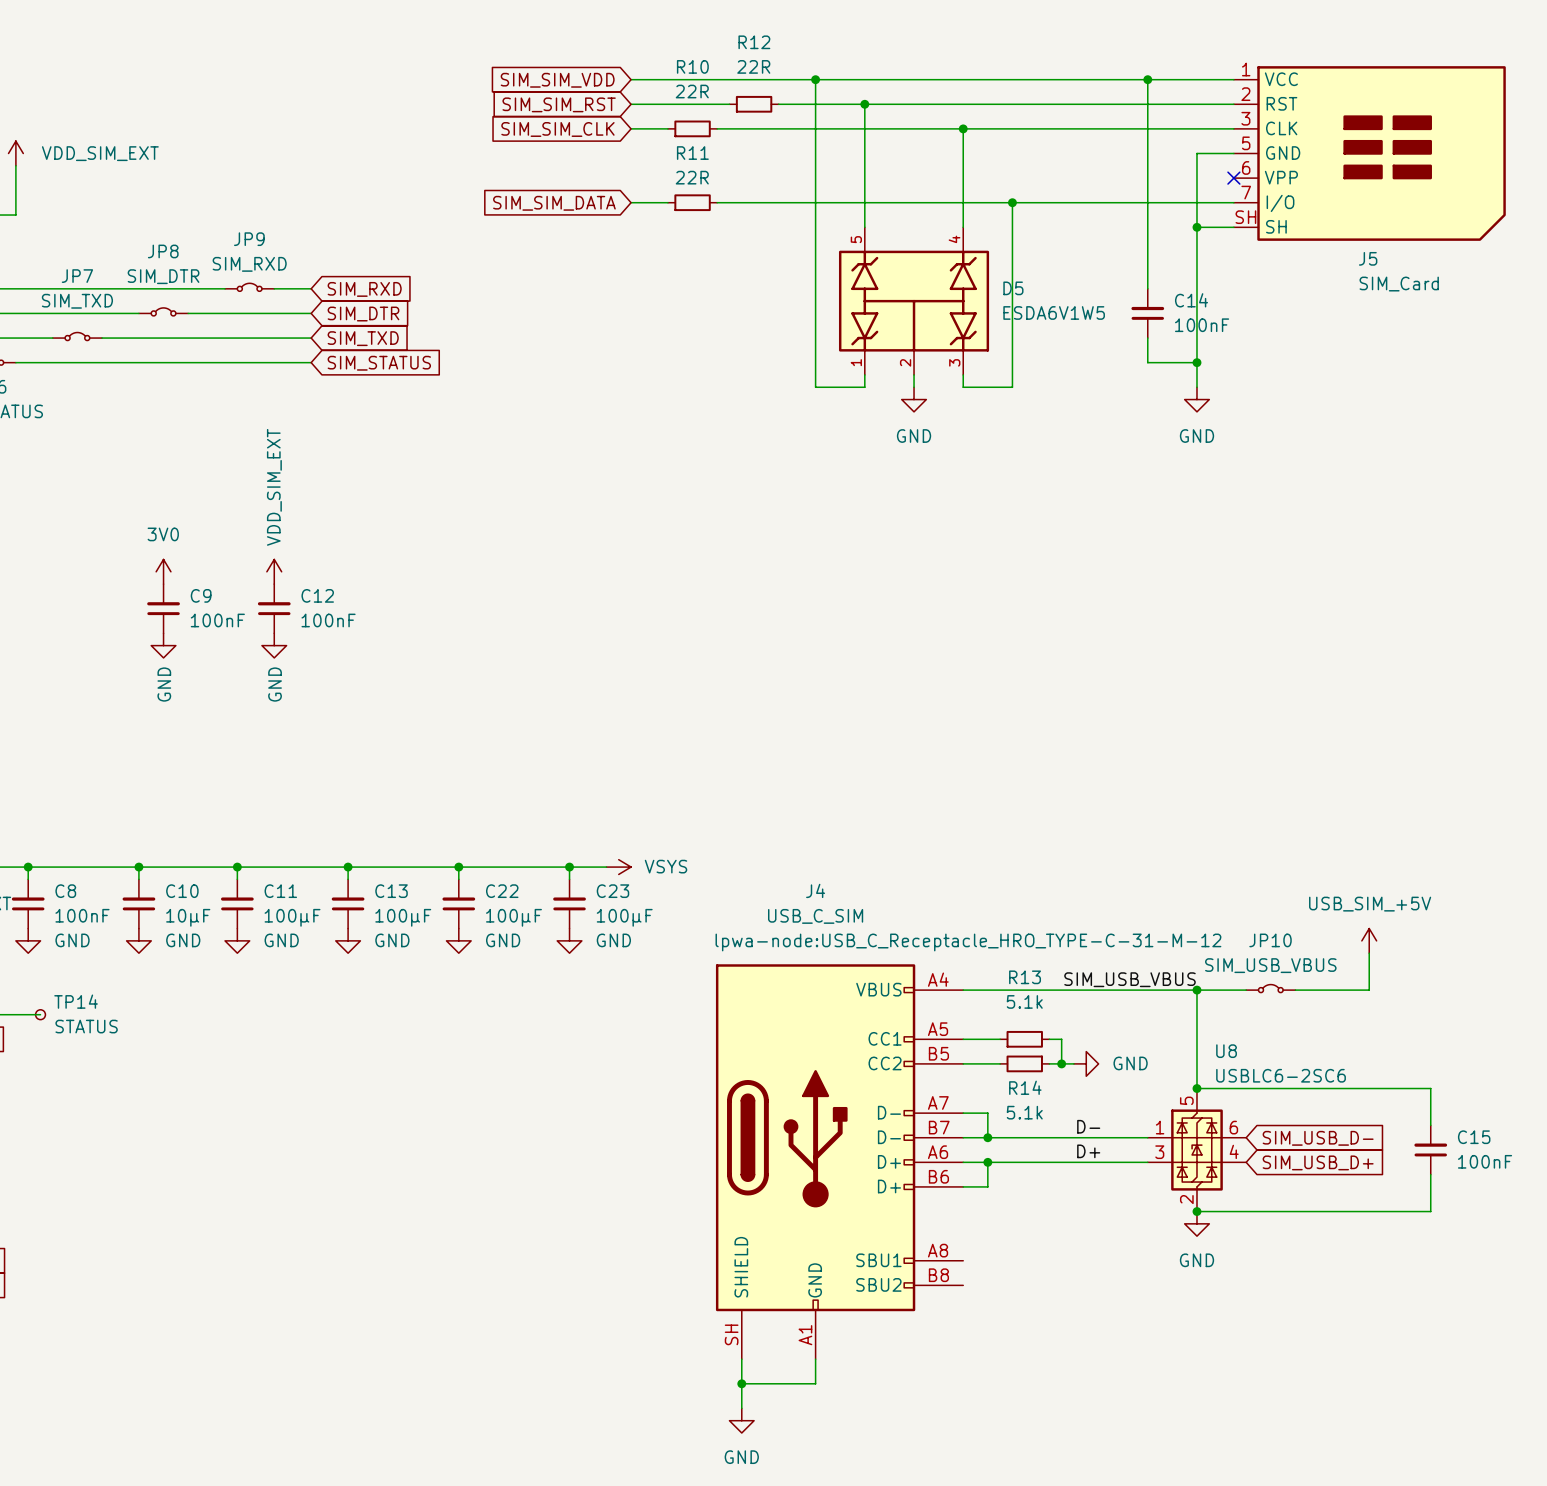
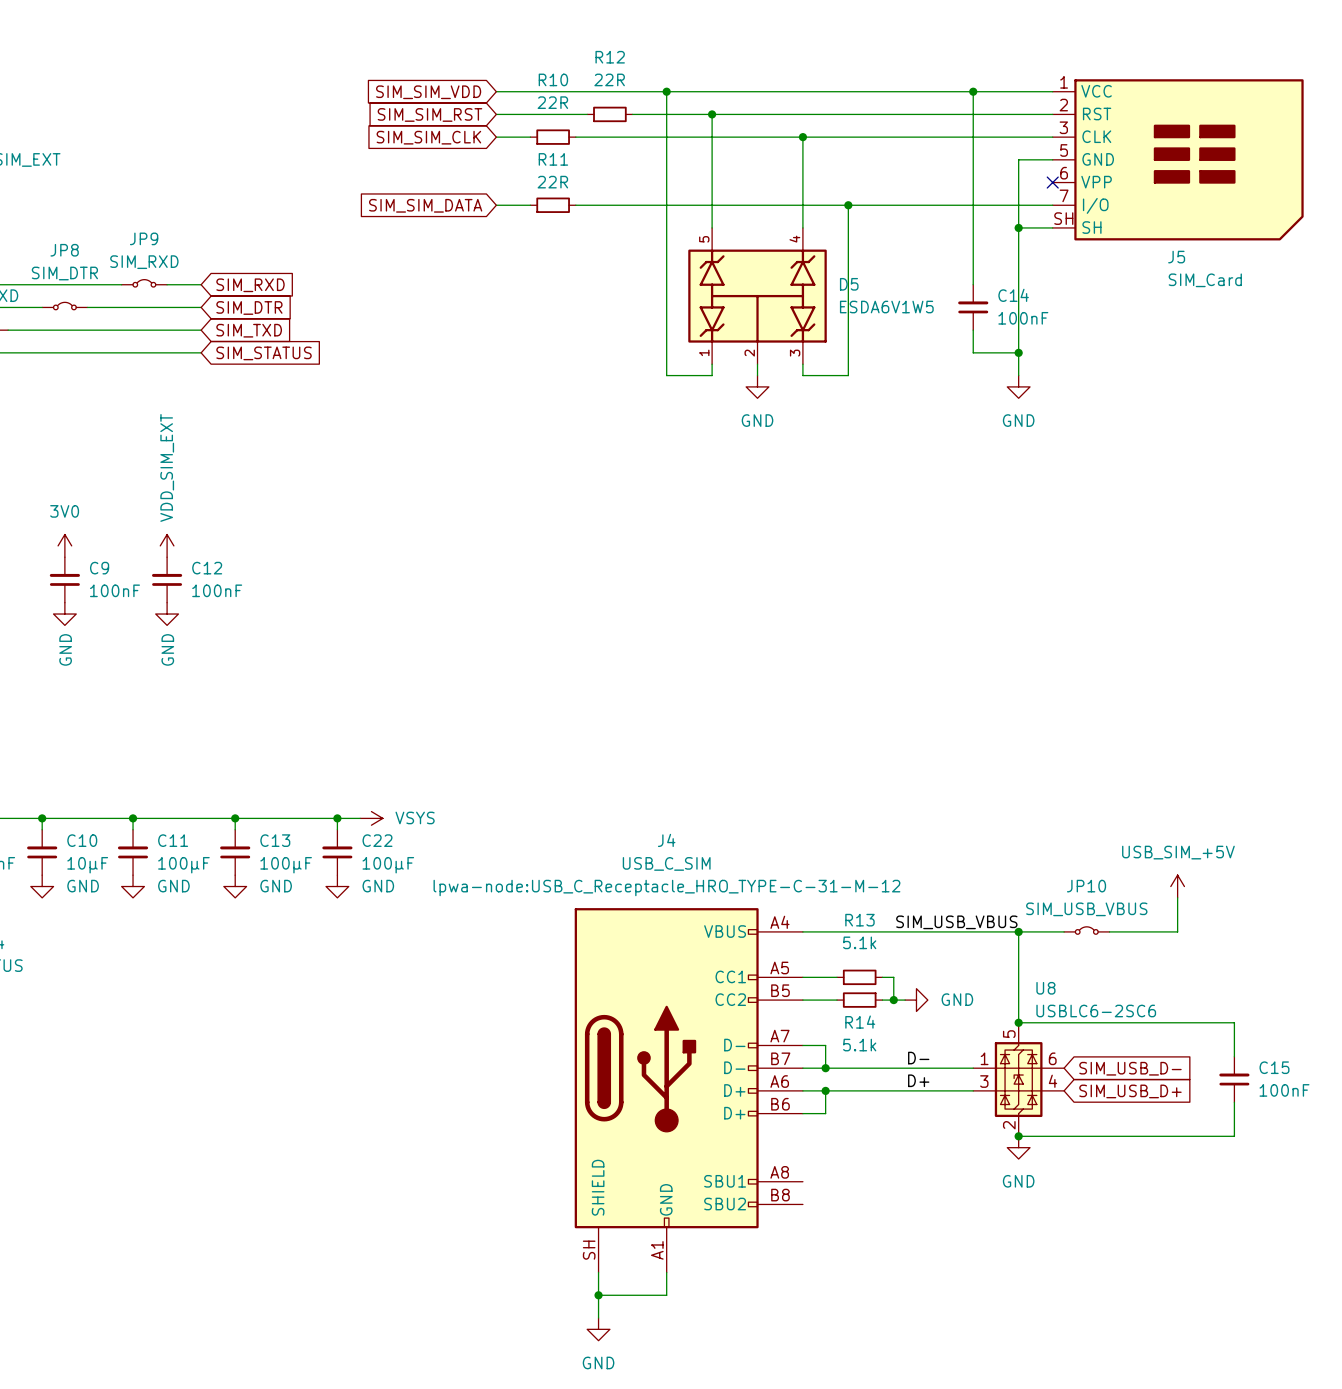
wire: (483, 867) (606, 867) -> none
wire: (569, 867) (569, 879) -> none
junction: (569, 867) -> none
power symbol position: VSYS (618, 867) -> VSYS (371, 818)
C23: 100µF (569, 903) -> none
power symbol: GND (569, 940) -> none
J4 text position: lpwa-node:USB_C_Receptacle_HRO_TYPE-C-31-M-12 (968, 942) -> lpwa-node:USB_C_Receptacle_HRO_TYPE-C-31-M-12 (666, 887)

